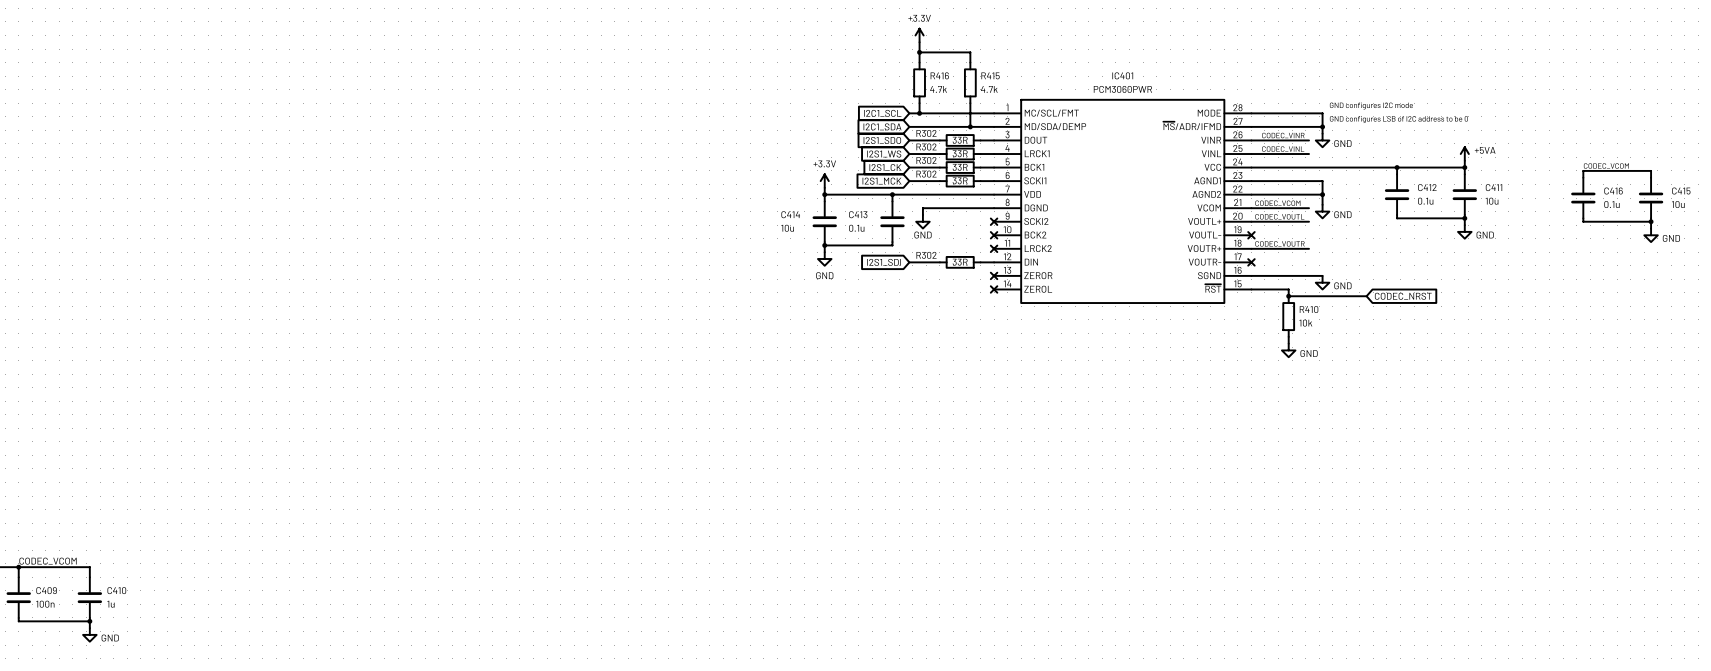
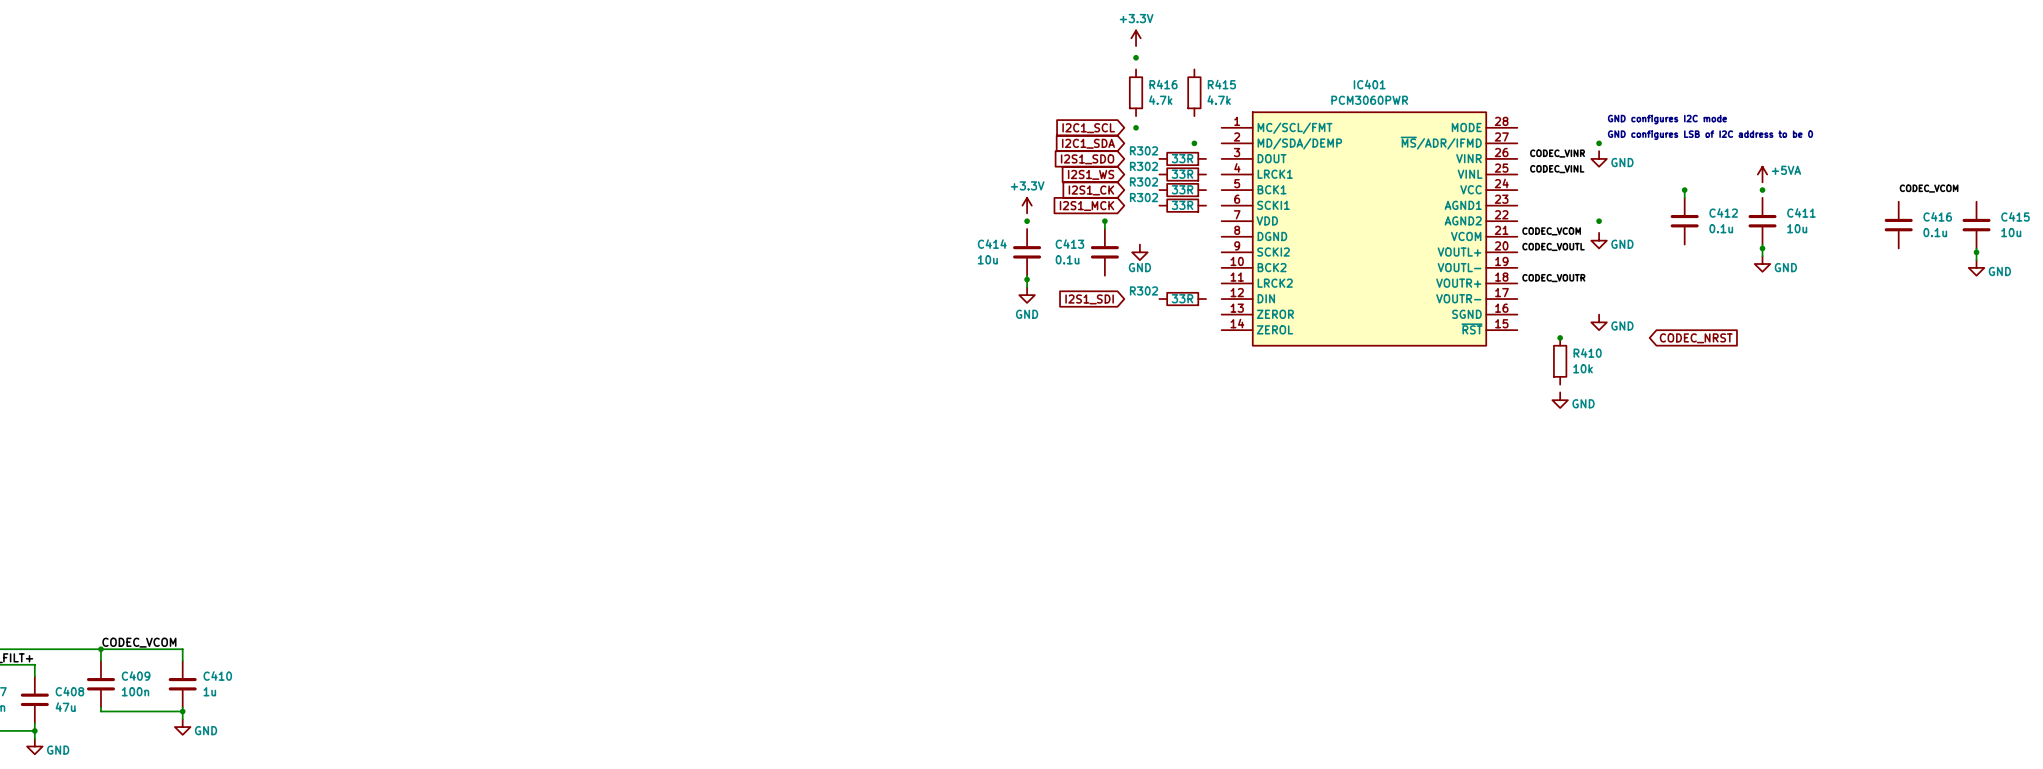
wire: (919, 42) (919, 62) -> none
wire: (919, 52) (970, 52) (970, 62) -> none
wire: (919, 103) (919, 113) -> none
wire: (970, 103) (970, 126) -> none
wire: (909, 113) (994, 113) -> none
wire: (1251, 113) (1322, 113) (1322, 133) -> none
wire: (909, 126) (994, 126) -> none
wire: (1251, 126) (1322, 126) -> none
wire: (909, 140) (939, 140) -> none
wire: (980, 140) (994, 140) -> none
wire: (1251, 140) (1309, 140) -> none
wire: (909, 154) (939, 154) -> none
wire: (980, 154) (994, 154) -> none
wire: (1251, 154) (1309, 154) -> none
wire: (1464, 160) (1464, 174) -> none
wire: (909, 167) (939, 167) -> none
wire: (980, 167) (994, 167) -> none
wire: (1251, 167) (1464, 167) -> none
wire: (1583, 177) (1583, 170) (1651, 170) (1651, 177) -> none
wire: (909, 181) (939, 181) -> none
wire: (980, 181) (994, 181) -> none
wire: (1251, 181) (1322, 181) (1322, 204) -> none
wire: (824, 187) (824, 201) -> none
wire: (824, 194) (994, 194) -> none
wire: (1251, 194) (1322, 194) -> none
wire: (994, 208) (922, 208) (922, 214) -> none
wire: (1251, 208) (1309, 208) -> none
wire: (1397, 214) (1397, 218) (1464, 218) -> none
wire: (1583, 218) (1583, 221) (1651, 221) -> none
no-connect mark: (994, 221) -> none
wire: (1251, 221) (1309, 221) -> none
no-connect mark: (994, 235) -> none
no-connect mark: (1251, 235) -> none
wire: (892, 242) (892, 245) (824, 245) -> none
no-connect mark: (994, 248) -> none
wire: (1251, 248) (1309, 248) -> none
wire: (909, 262) (939, 262) -> none
wire: (980, 262) (994, 262) -> none
no-connect mark: (1251, 262) -> none
no-connect mark: (994, 275) -> none
wire: (1251, 275) (1322, 275) -> none
no-connect mark: (994, 289) -> none
wire: (1251, 289) (1288, 289) (1288, 296) (1366, 296) -> none
wire: (1288, 336) (1288, 343) -> none

